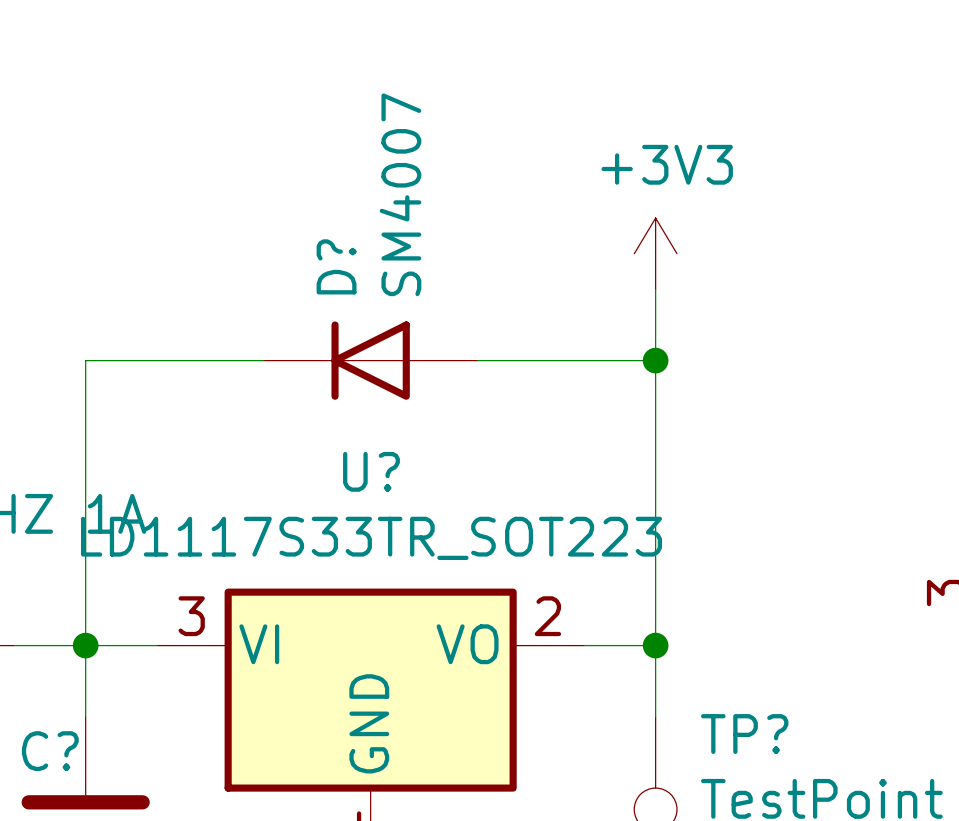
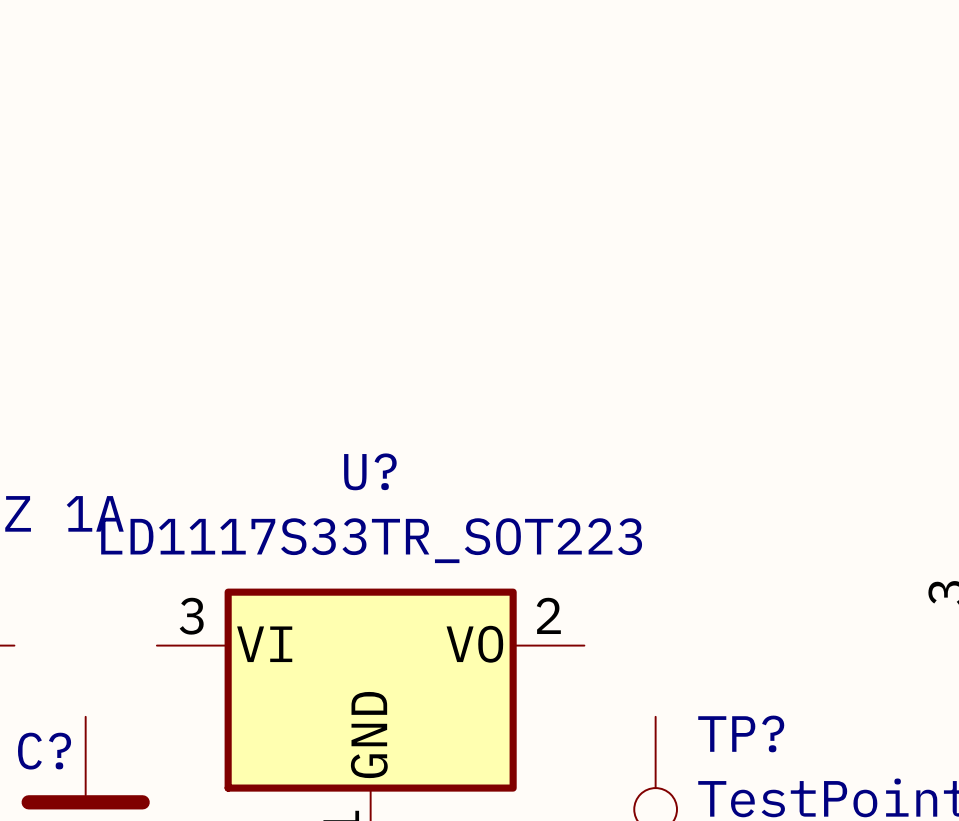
power symbol: +3V3 (655, 253) -> none
wire: (655, 289) (655, 716) -> none
wire: (263, 360) (85, 360) (85, 716) -> none
D?: SM4007 (370, 360) -> none
wire: (477, 360) (655, 360) -> none
junction: (655, 360) -> none
wire: (14, 645) (156, 645) -> none
junction: (85, 645) -> none
wire: (584, 645) (655, 645) -> none
junction: (655, 645) -> none

